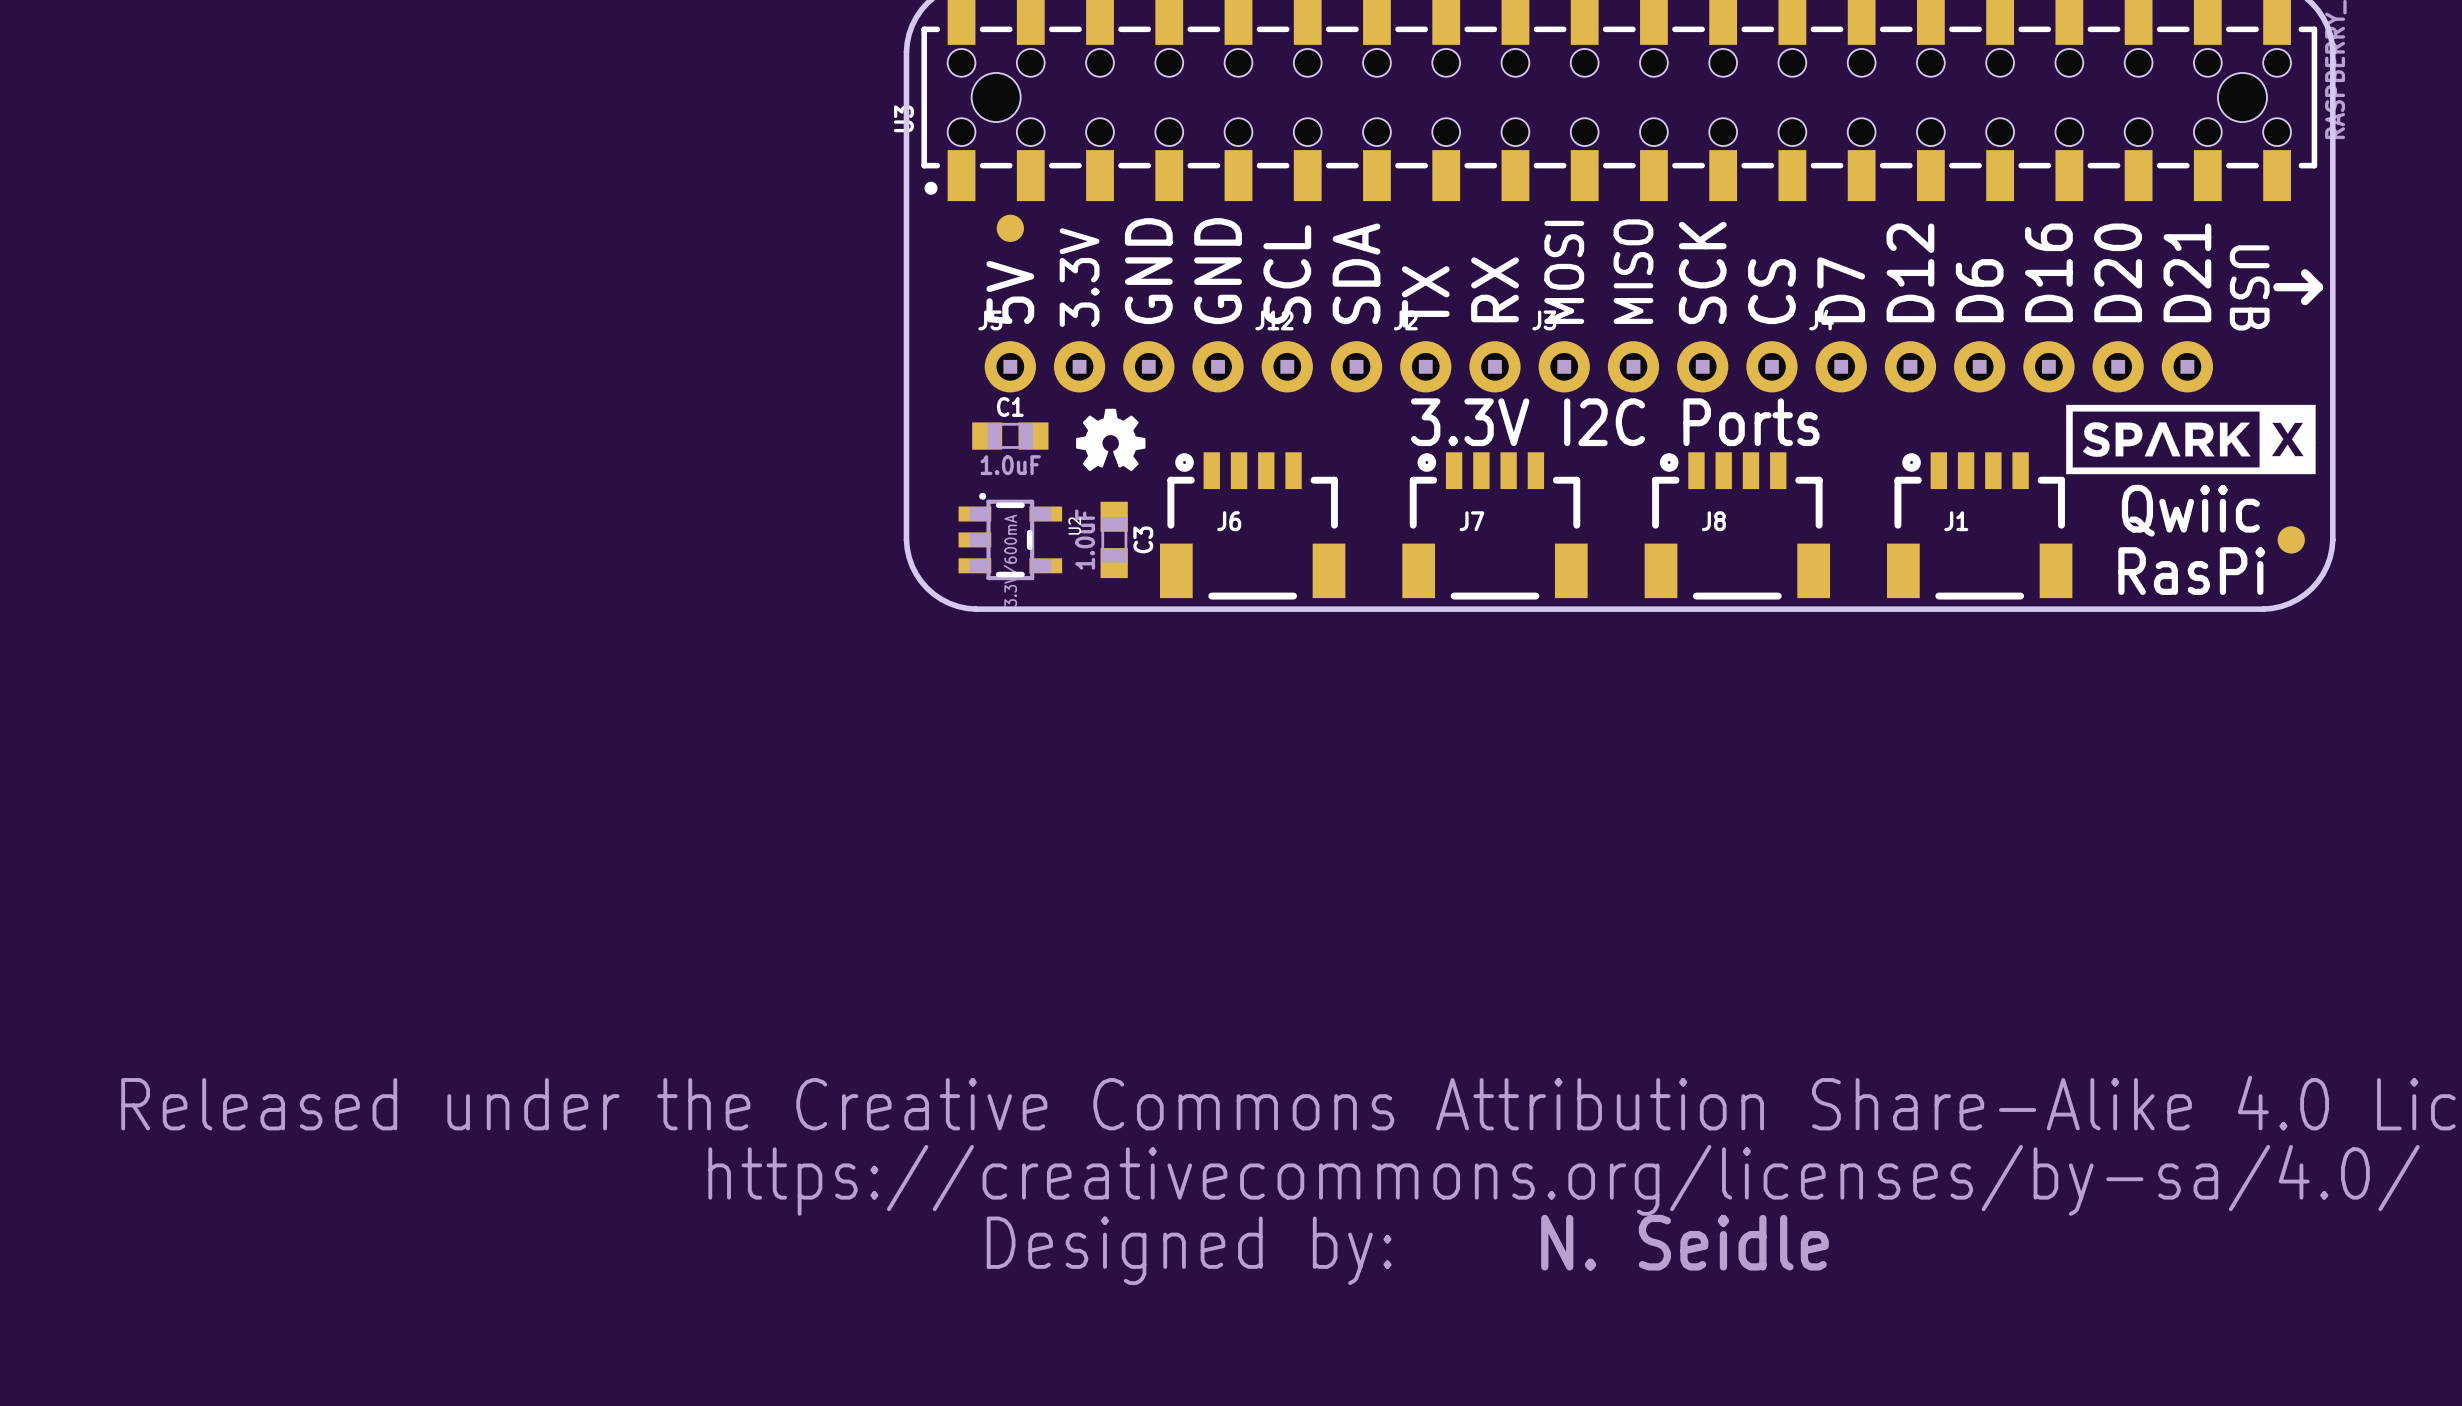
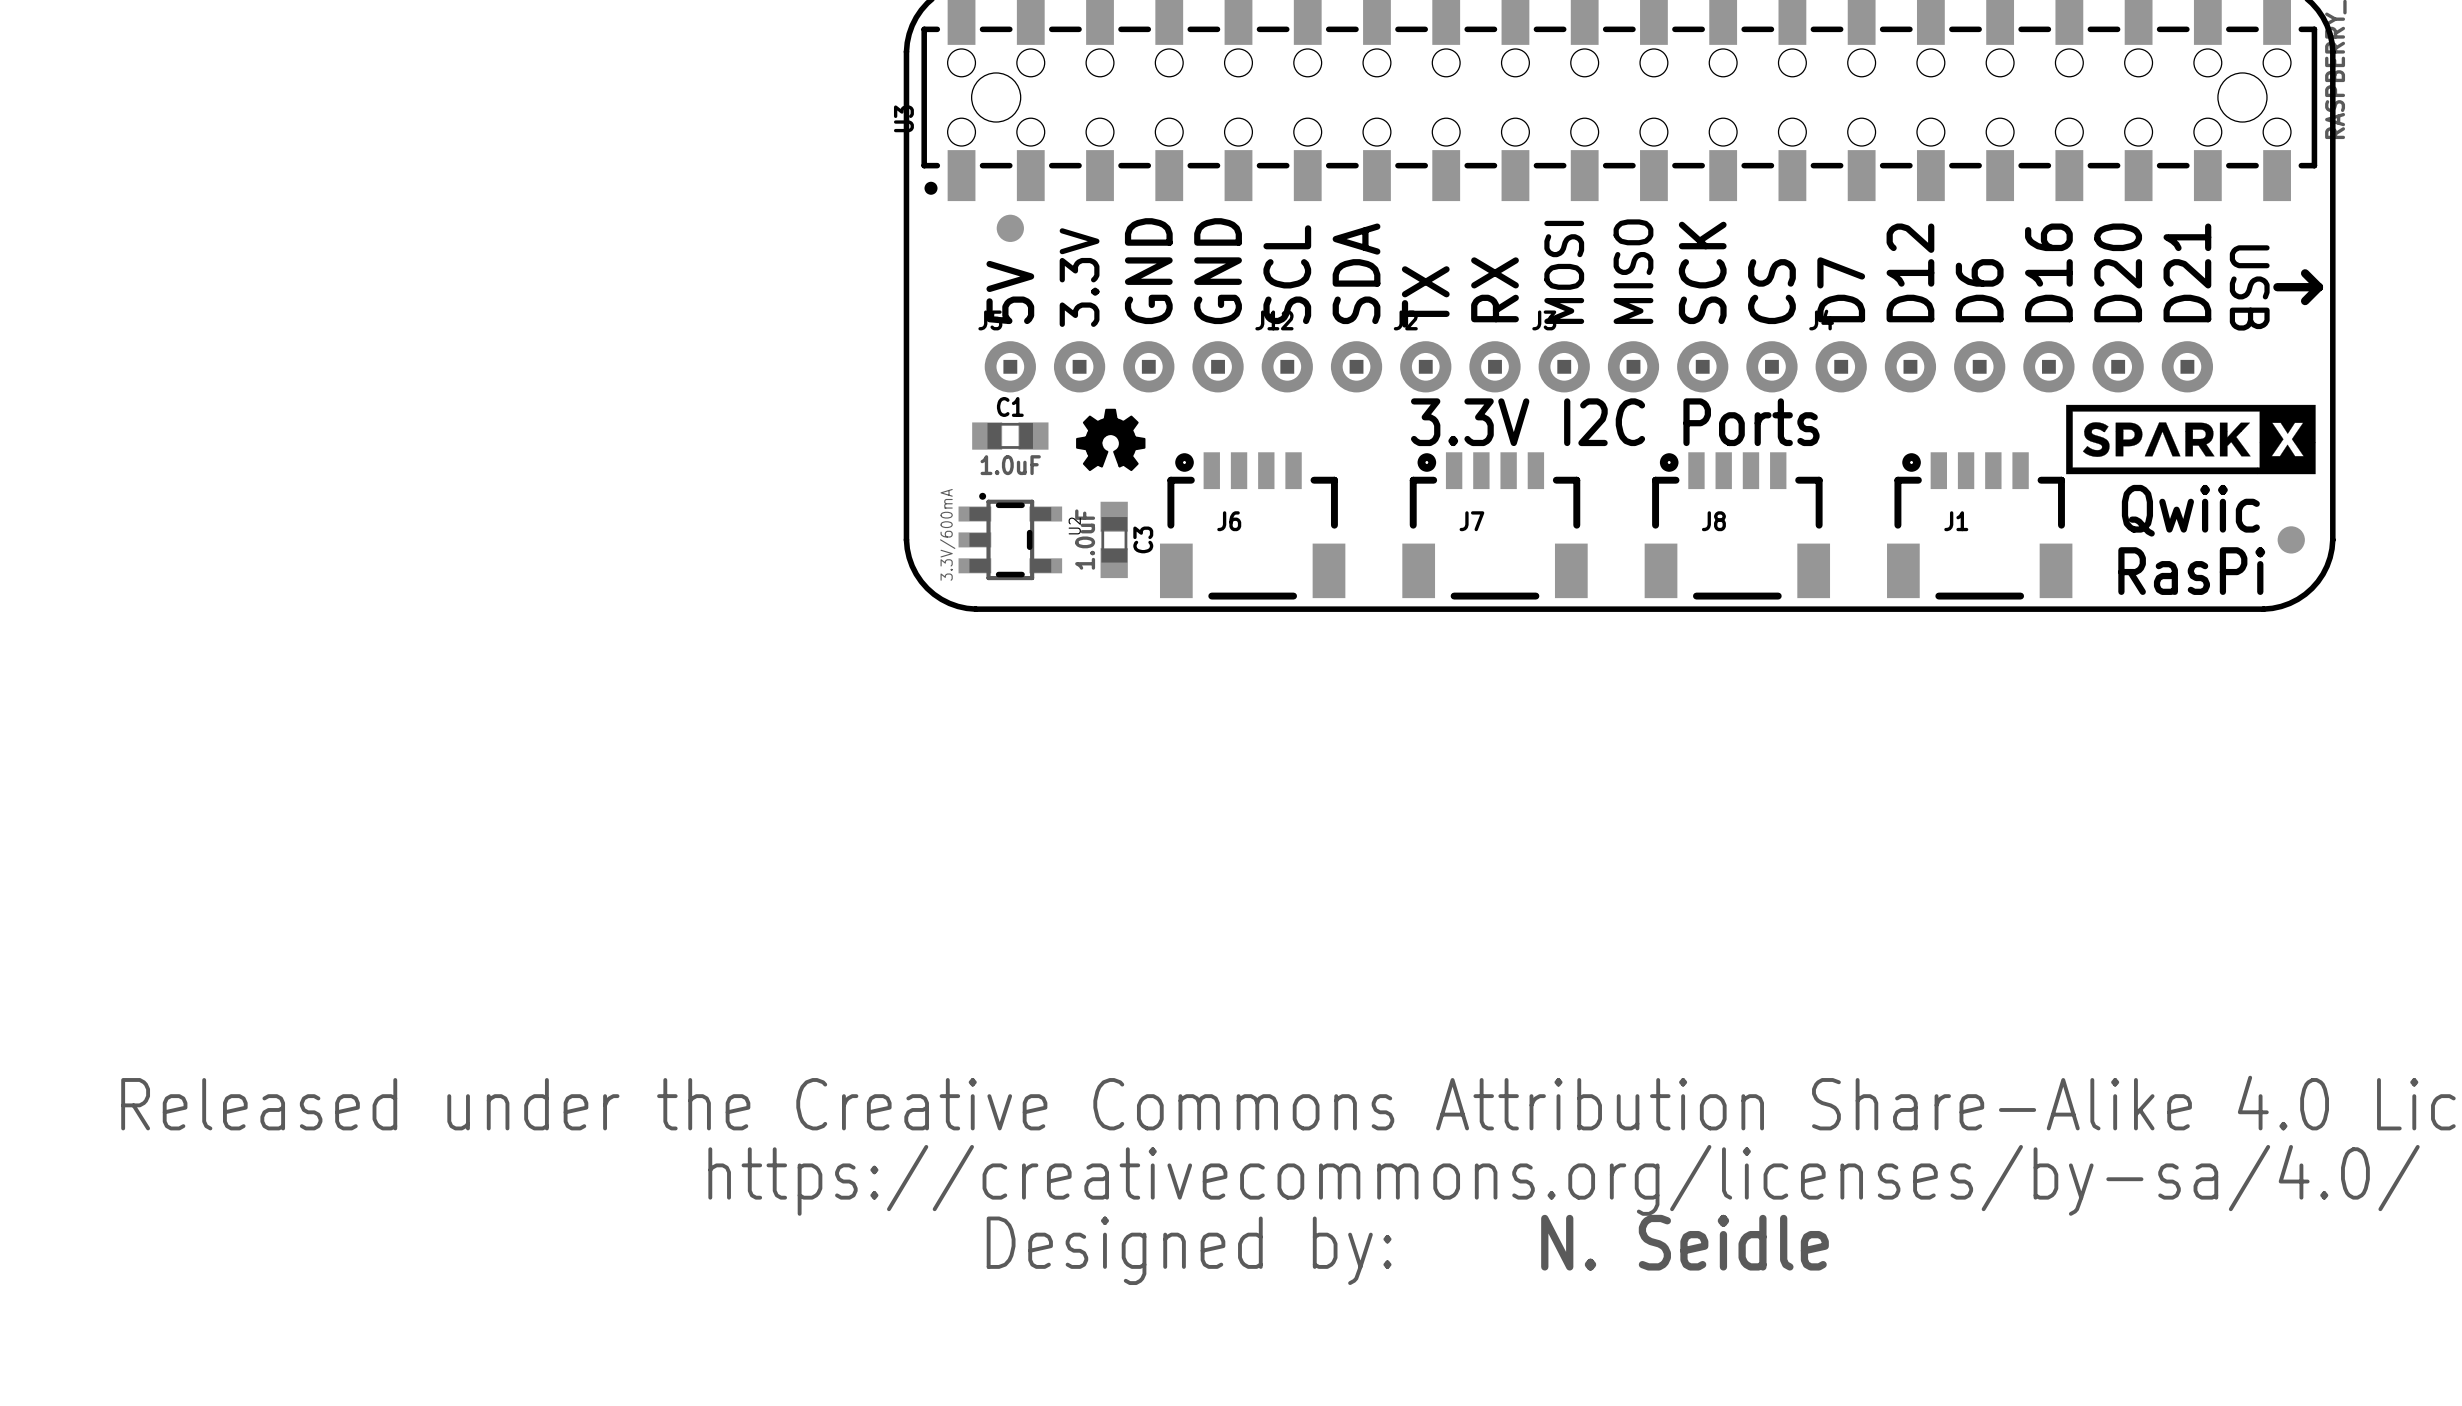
U2 value position: 3.3V/600mA (1011, 560) -> 3.3V/600mA (947, 534)

